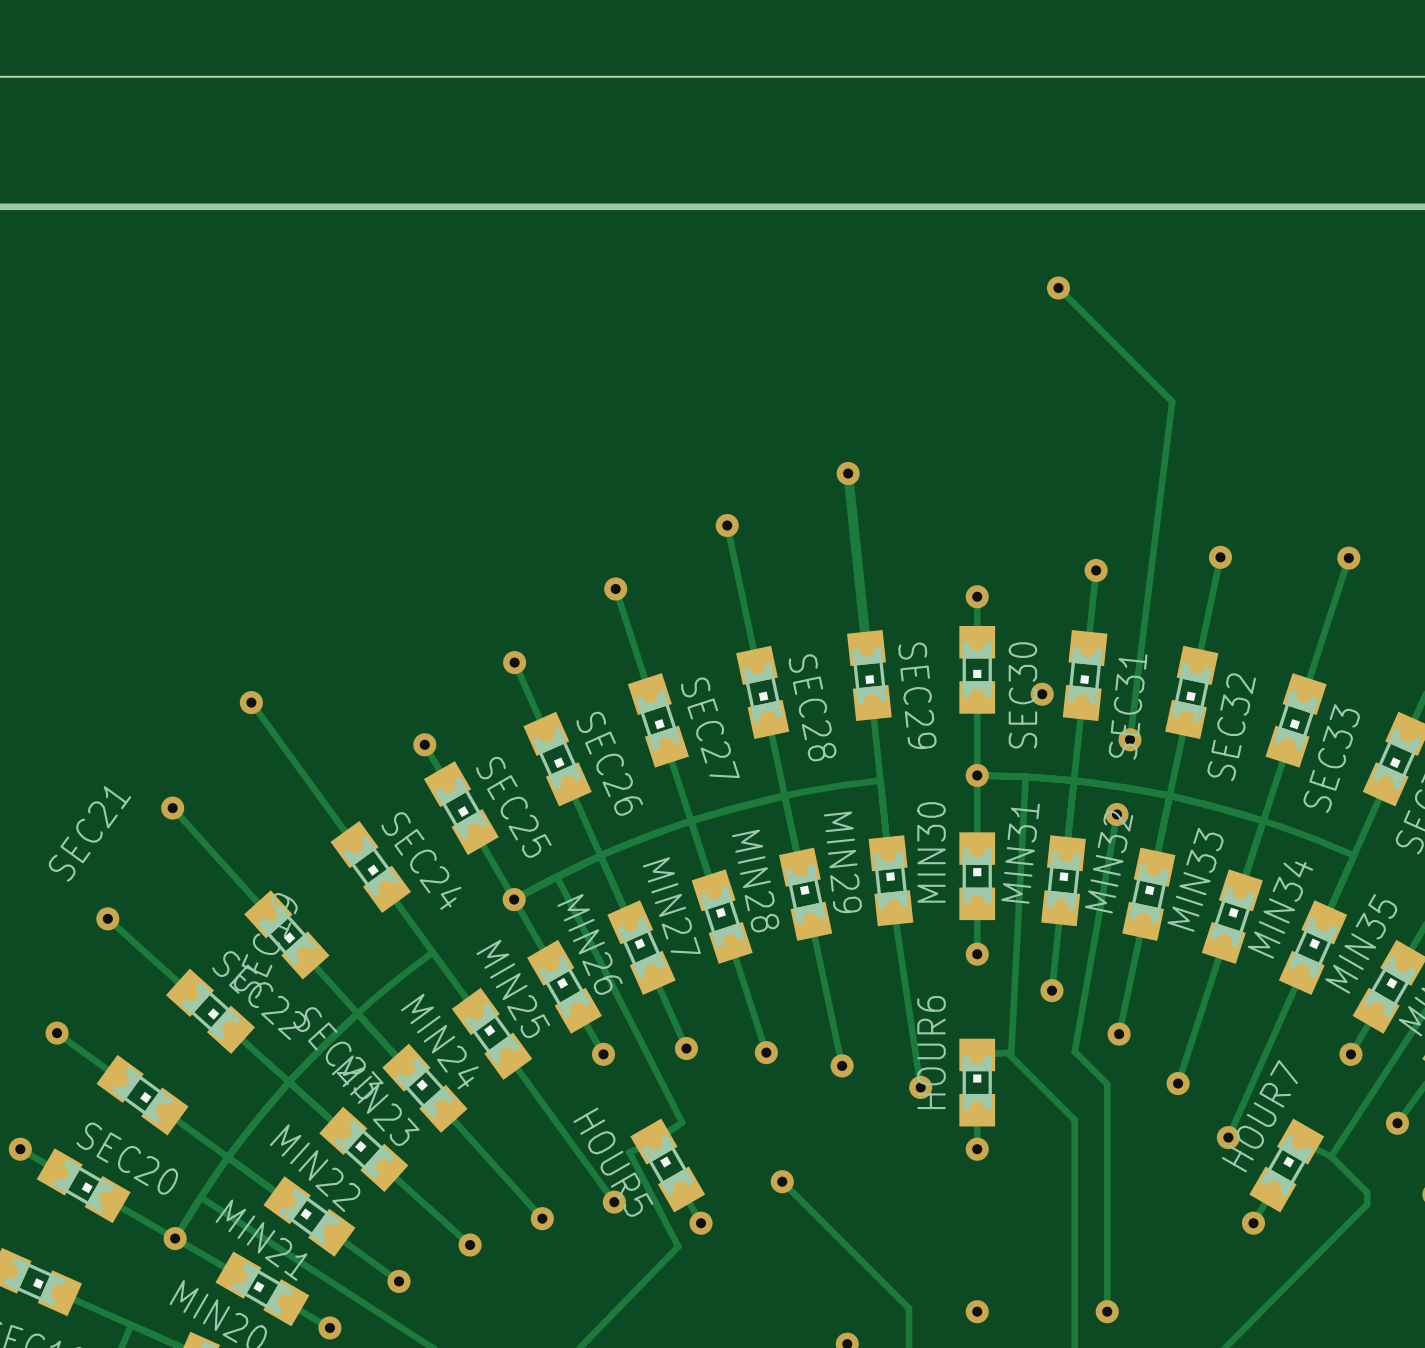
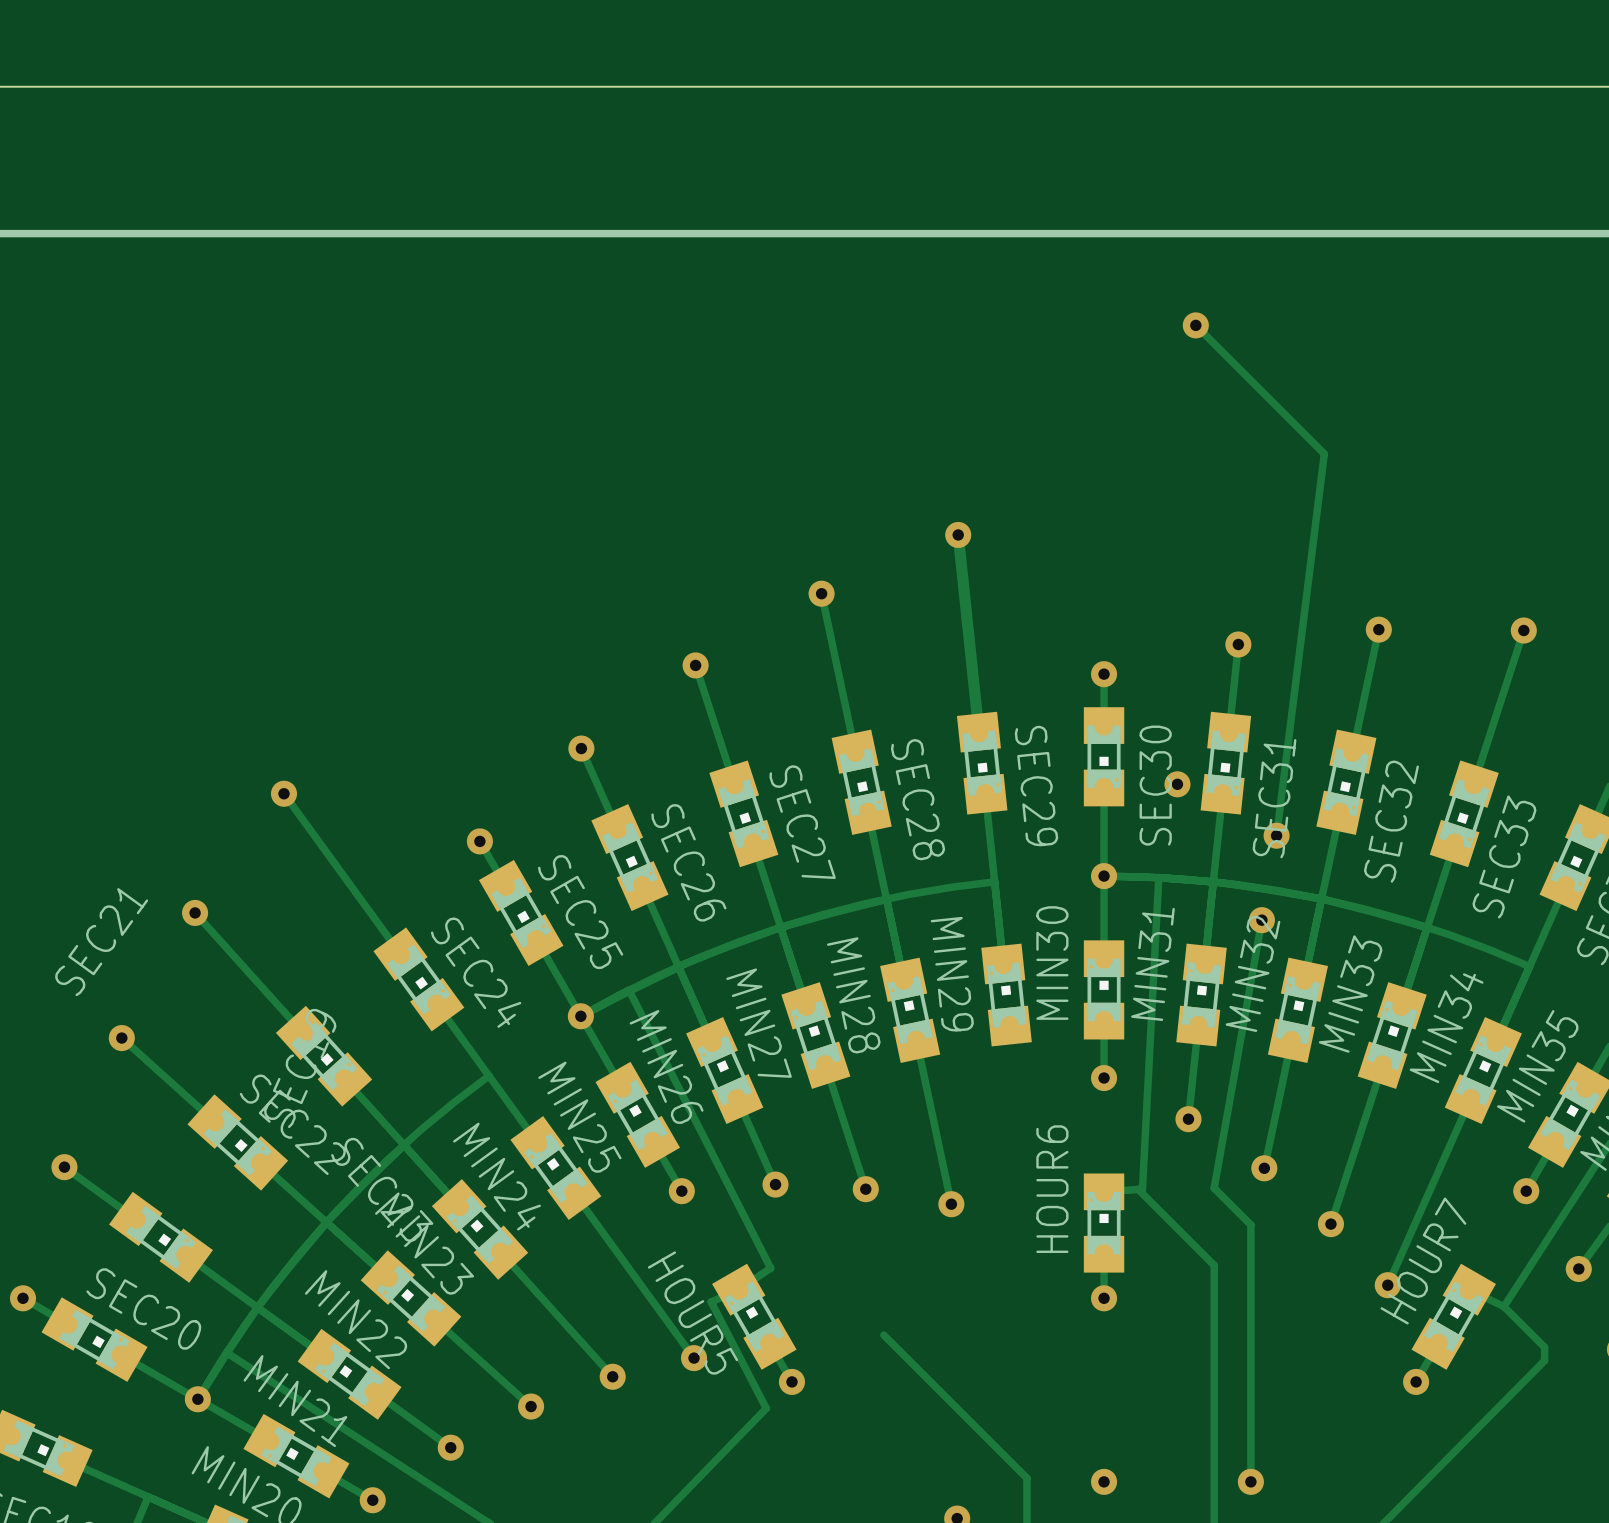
track: (893, 908) (920, 1087) -> none
via: (920, 1087) -> none
via: (782, 1181) -> none

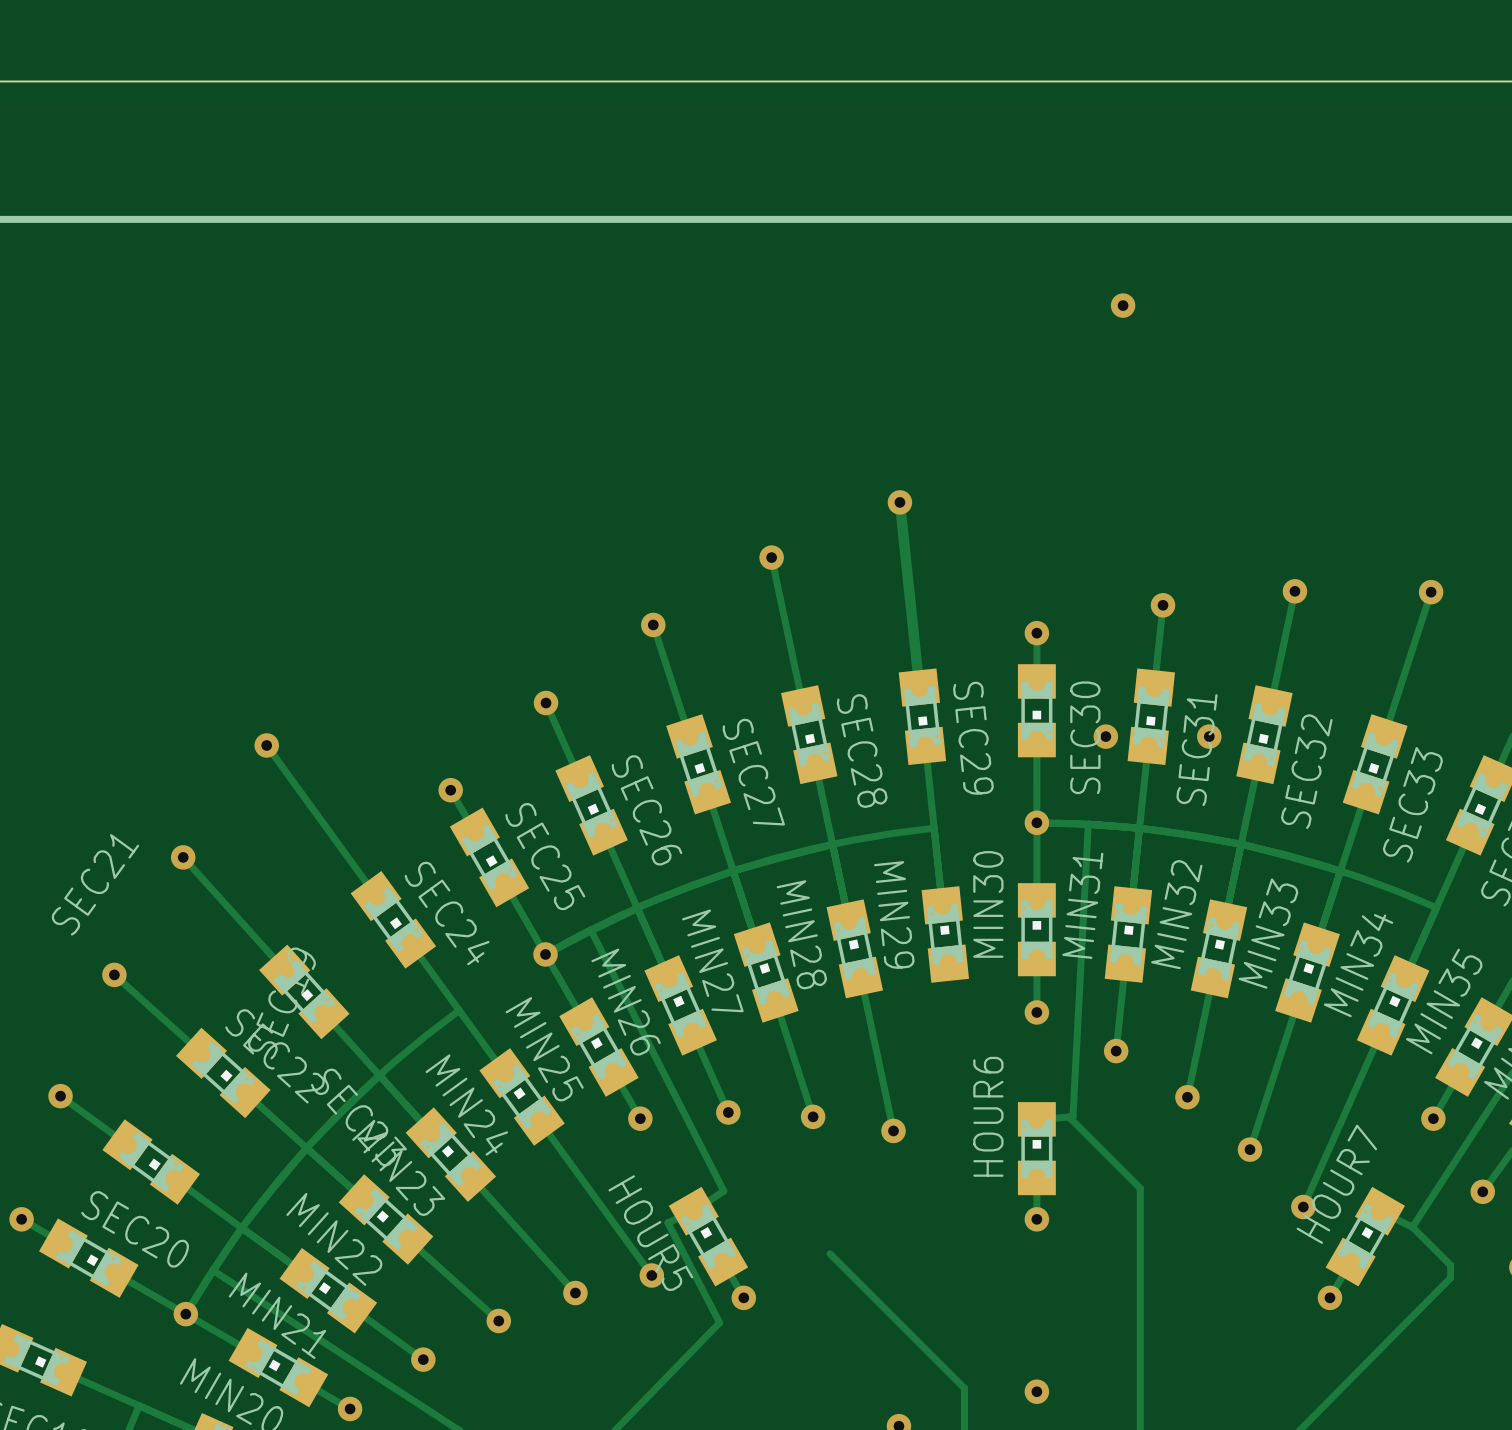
track: (1195, 325) (1324, 453) (1276, 835) -> none
via position: (1276, 835) -> (1209, 736)
track: (1261, 920) (1214, 1188) (1250, 1224) (1250, 1481) -> none
via: (1261, 920) -> none
via: (1250, 1481) -> none

